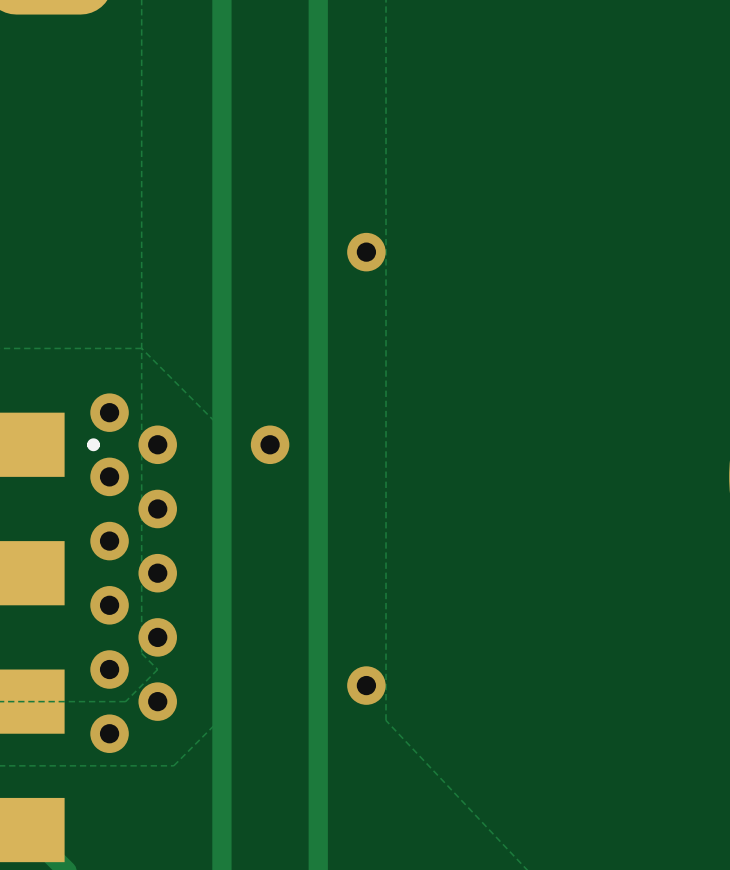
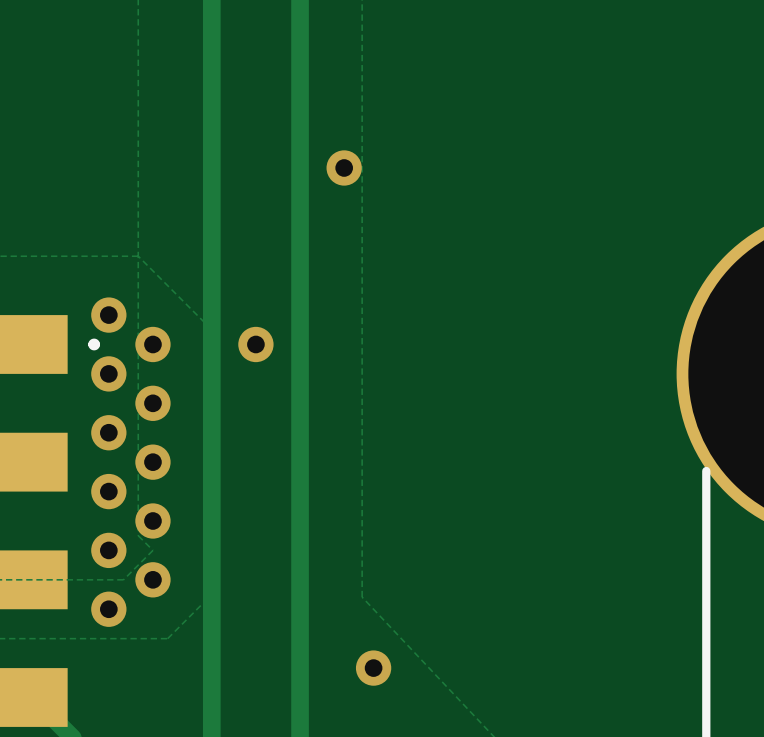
via position: (366, 685) -> (373, 668)

